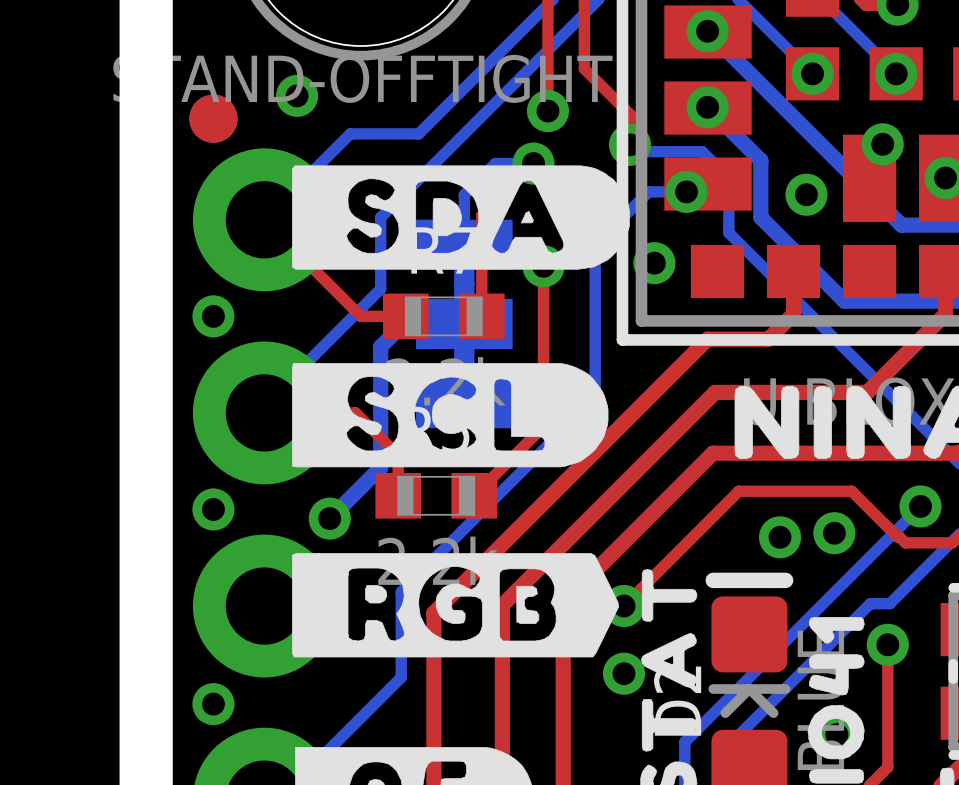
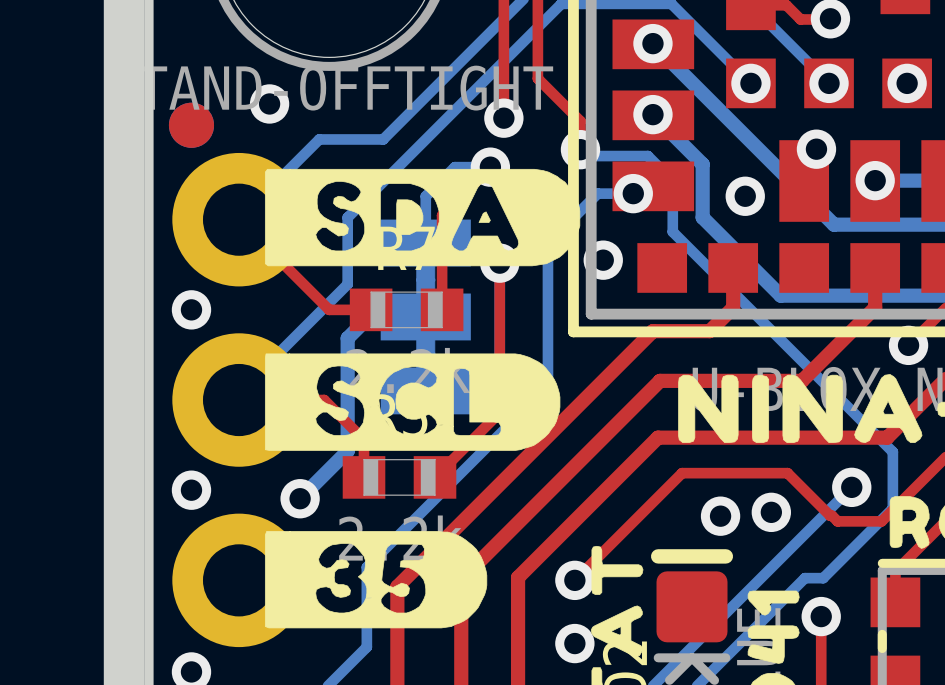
drawing shape: [292, 553, 620, 658] -> [264, 531, 488, 629]

